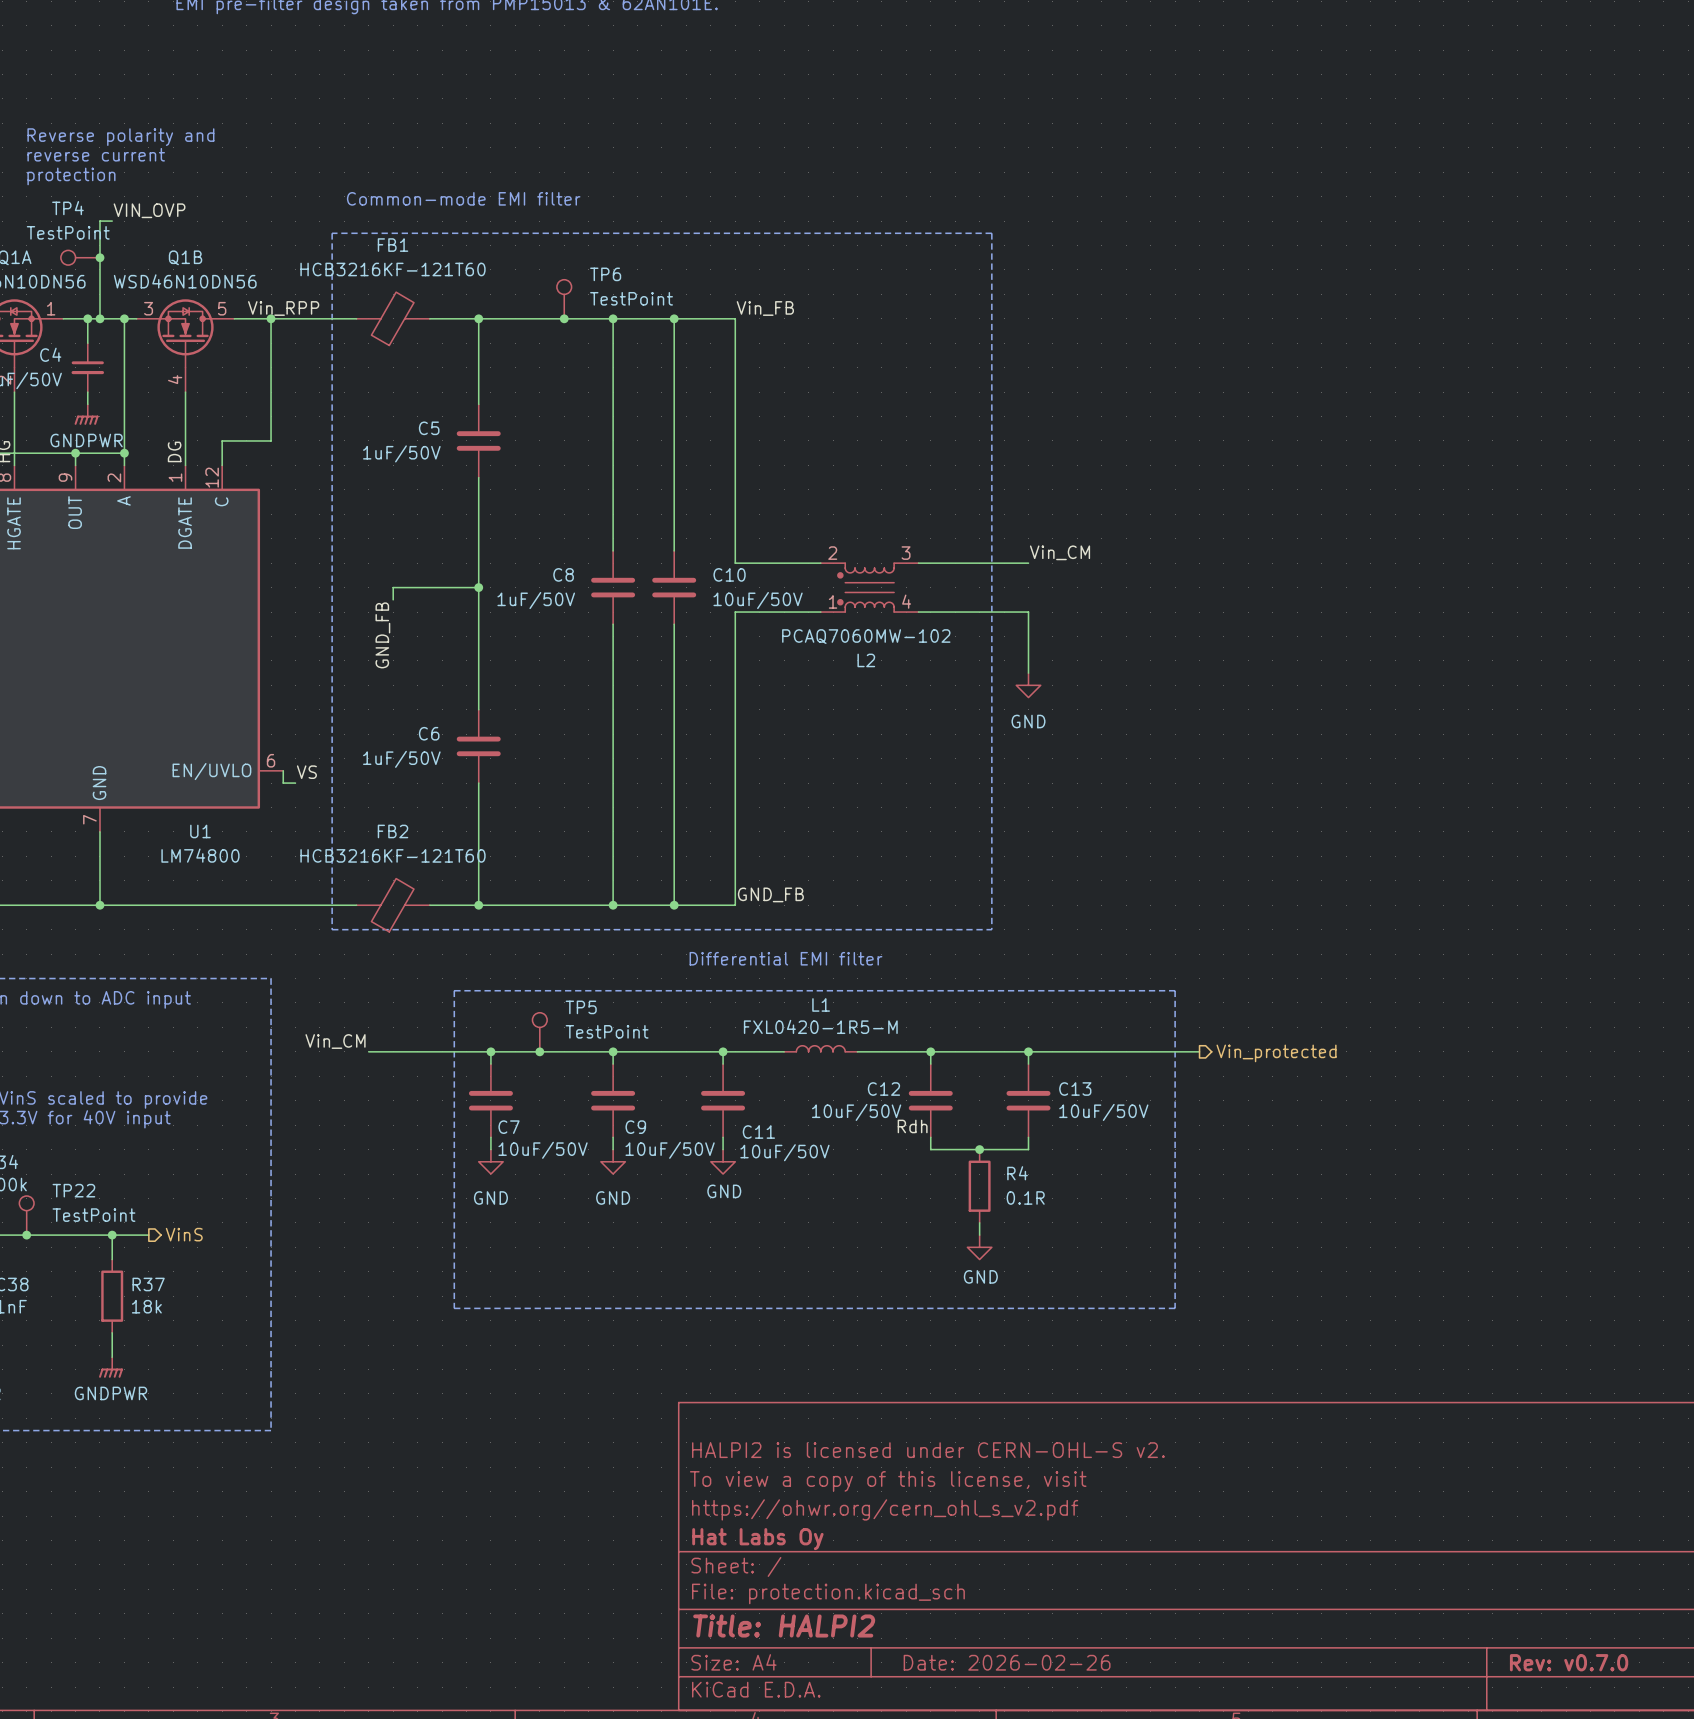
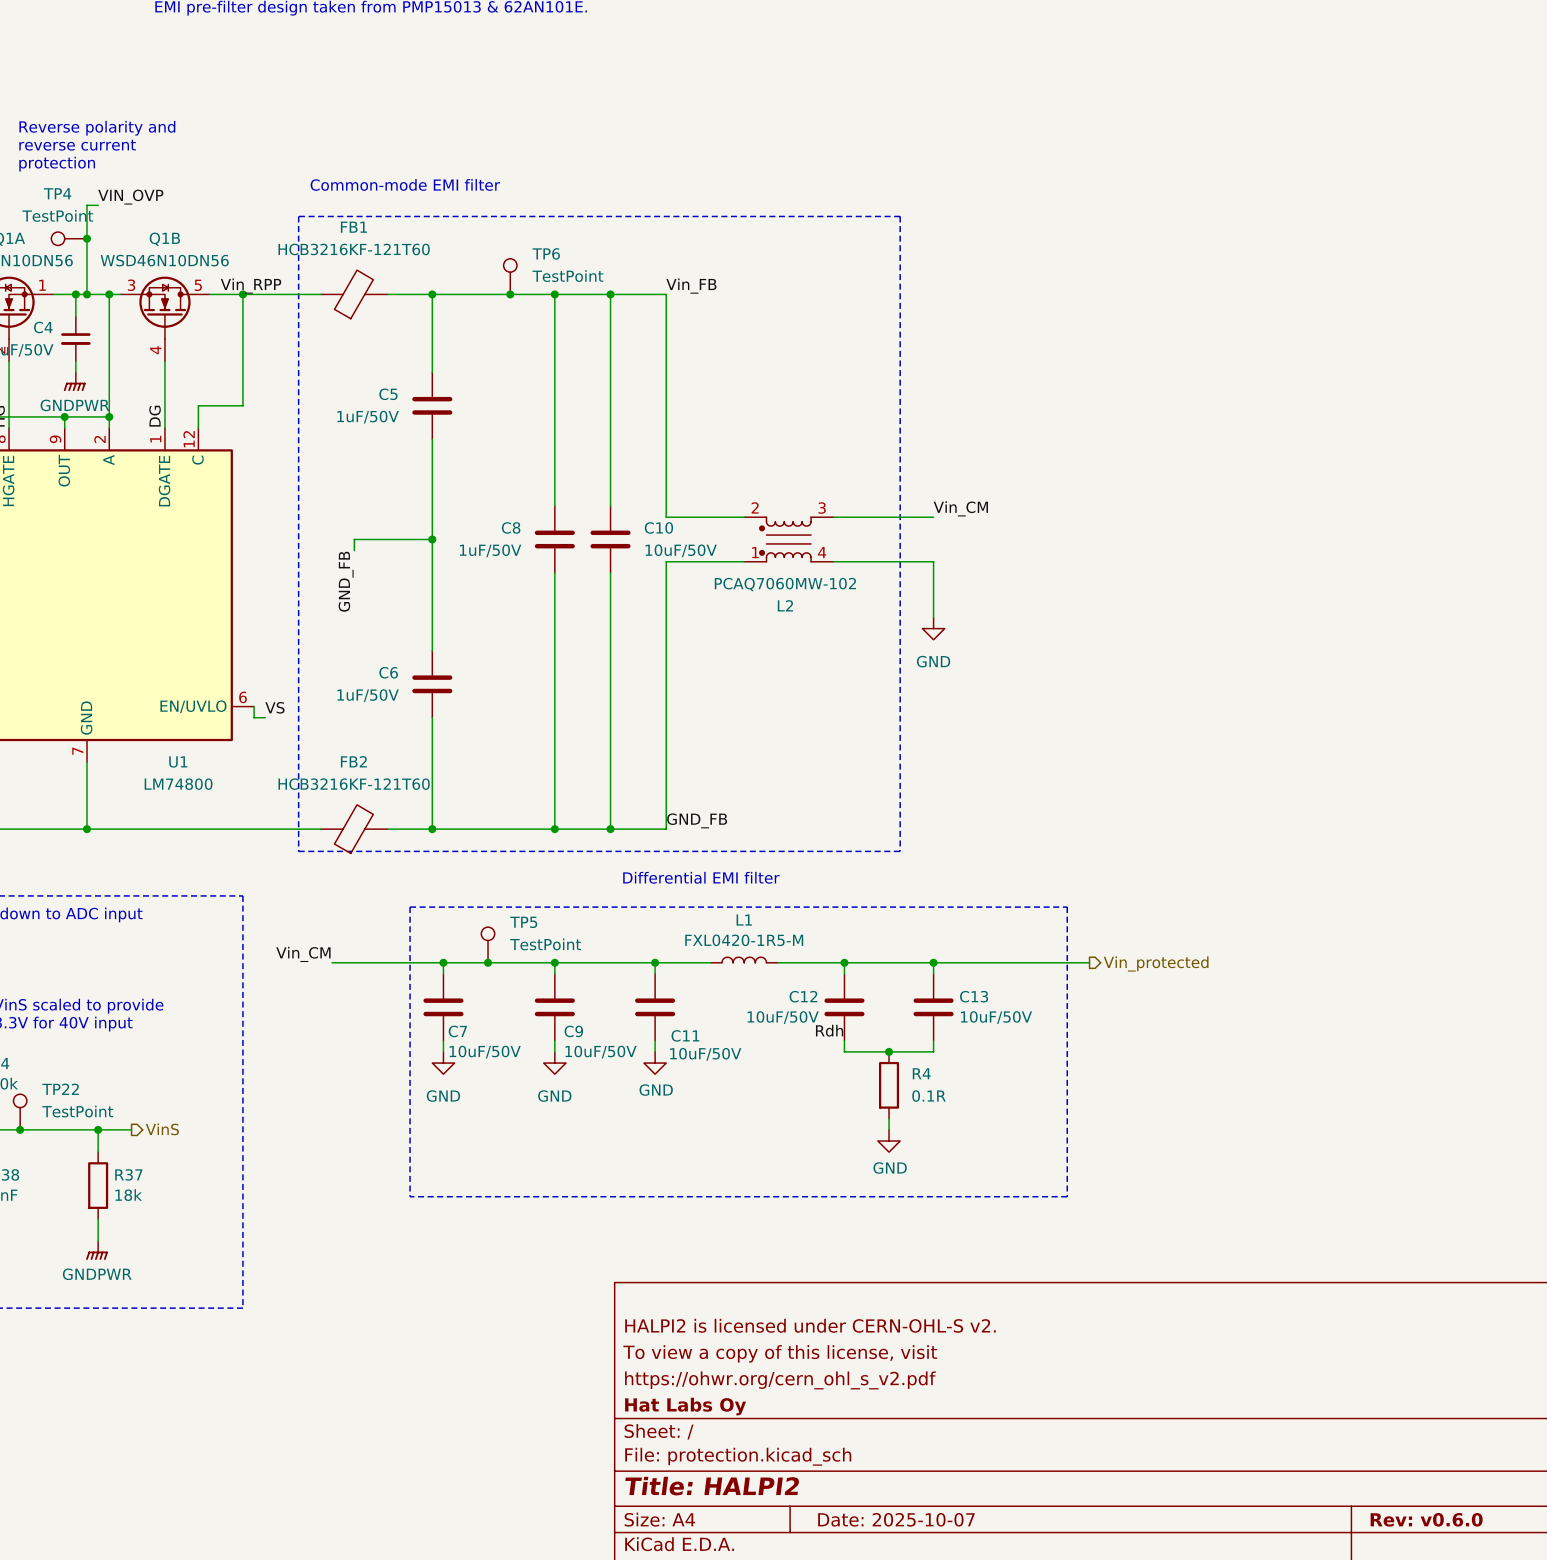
title block: Date: 2026-02-26 (1007, 1662) -> Date: 2025-10-07 (896, 1519)
title block: Rev: v0.7.0 (1569, 1662) -> Rev: v0.6.0 (1426, 1519)

